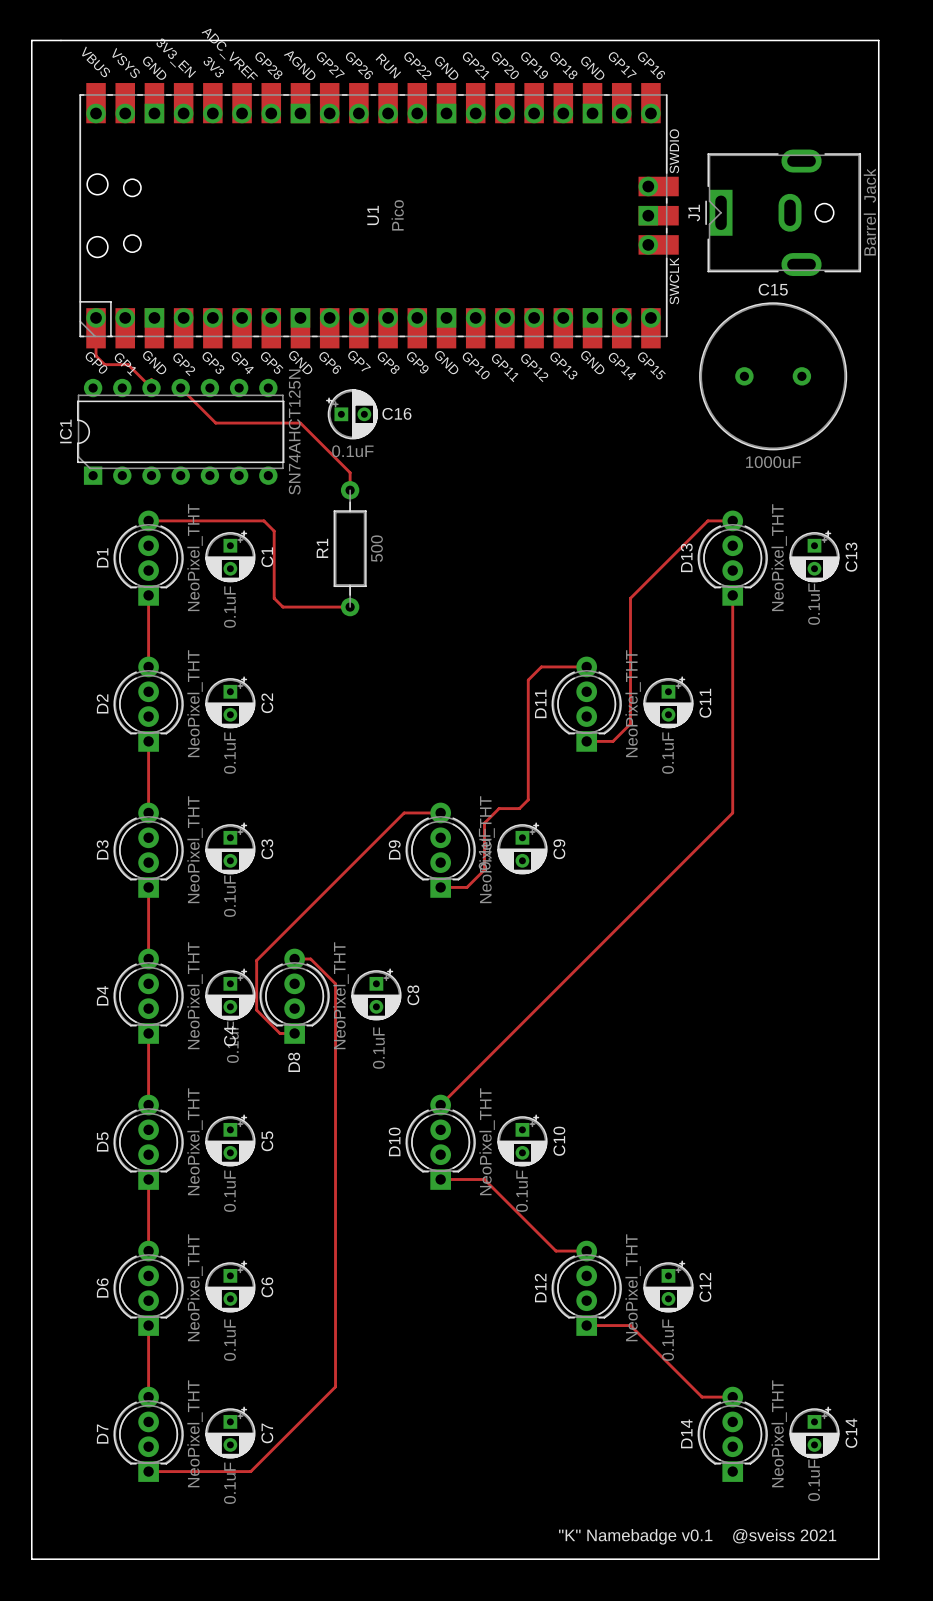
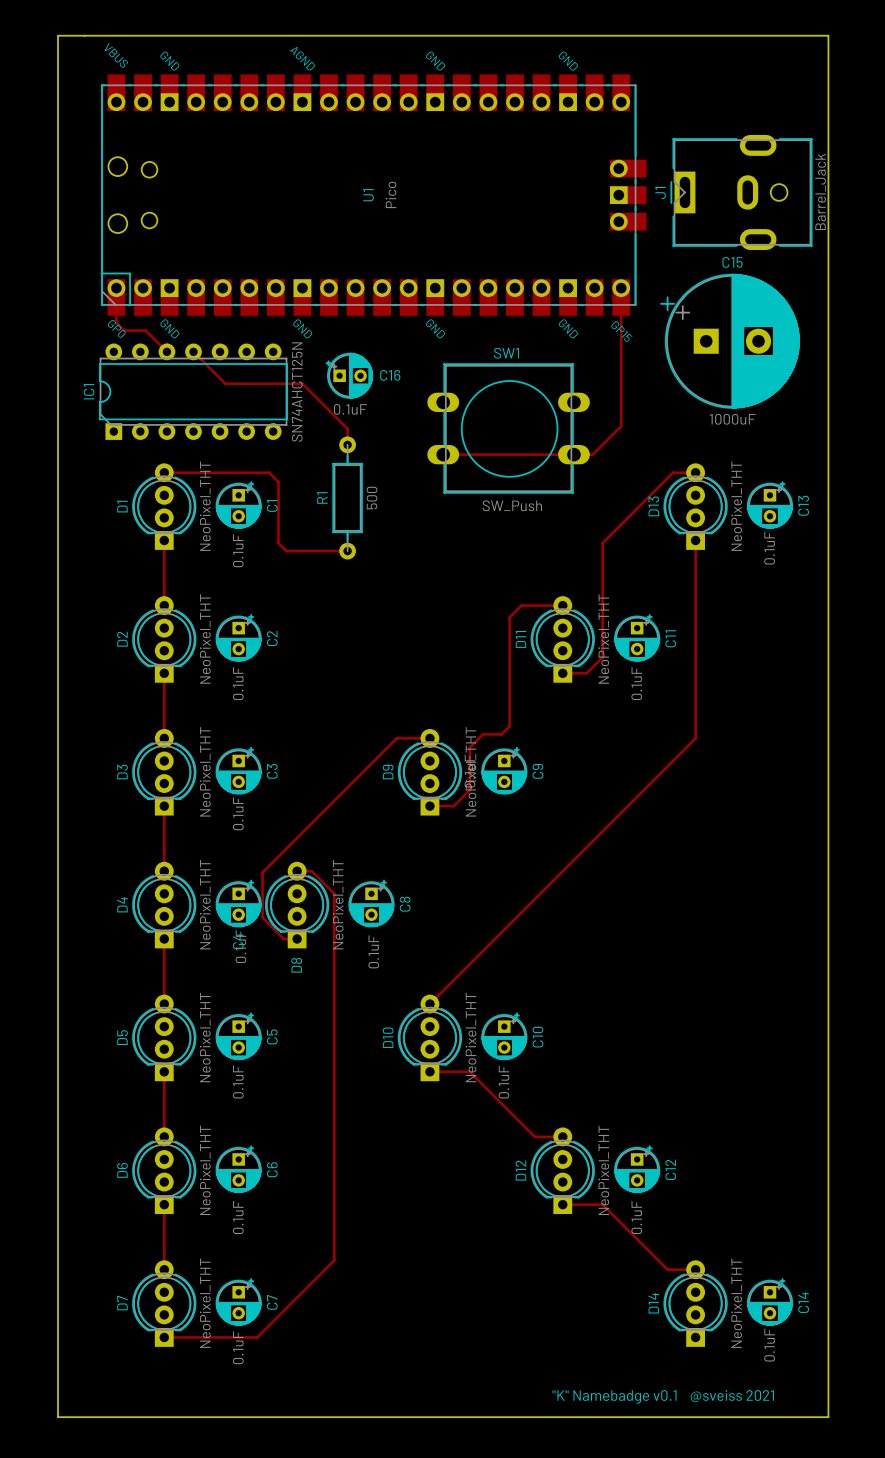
U1 footprint: [79, 83, 679, 349] -> [101, 74, 647, 316]
C15 footprint: [699, 302, 848, 451] -> [660, 273, 800, 409]
track: none -> (621, 288) (621, 426) (592, 454) (443, 454)
SW1: none -> SW_Push (508, 428)

